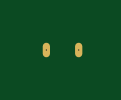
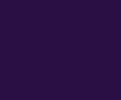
part: (62, 50) -> none

